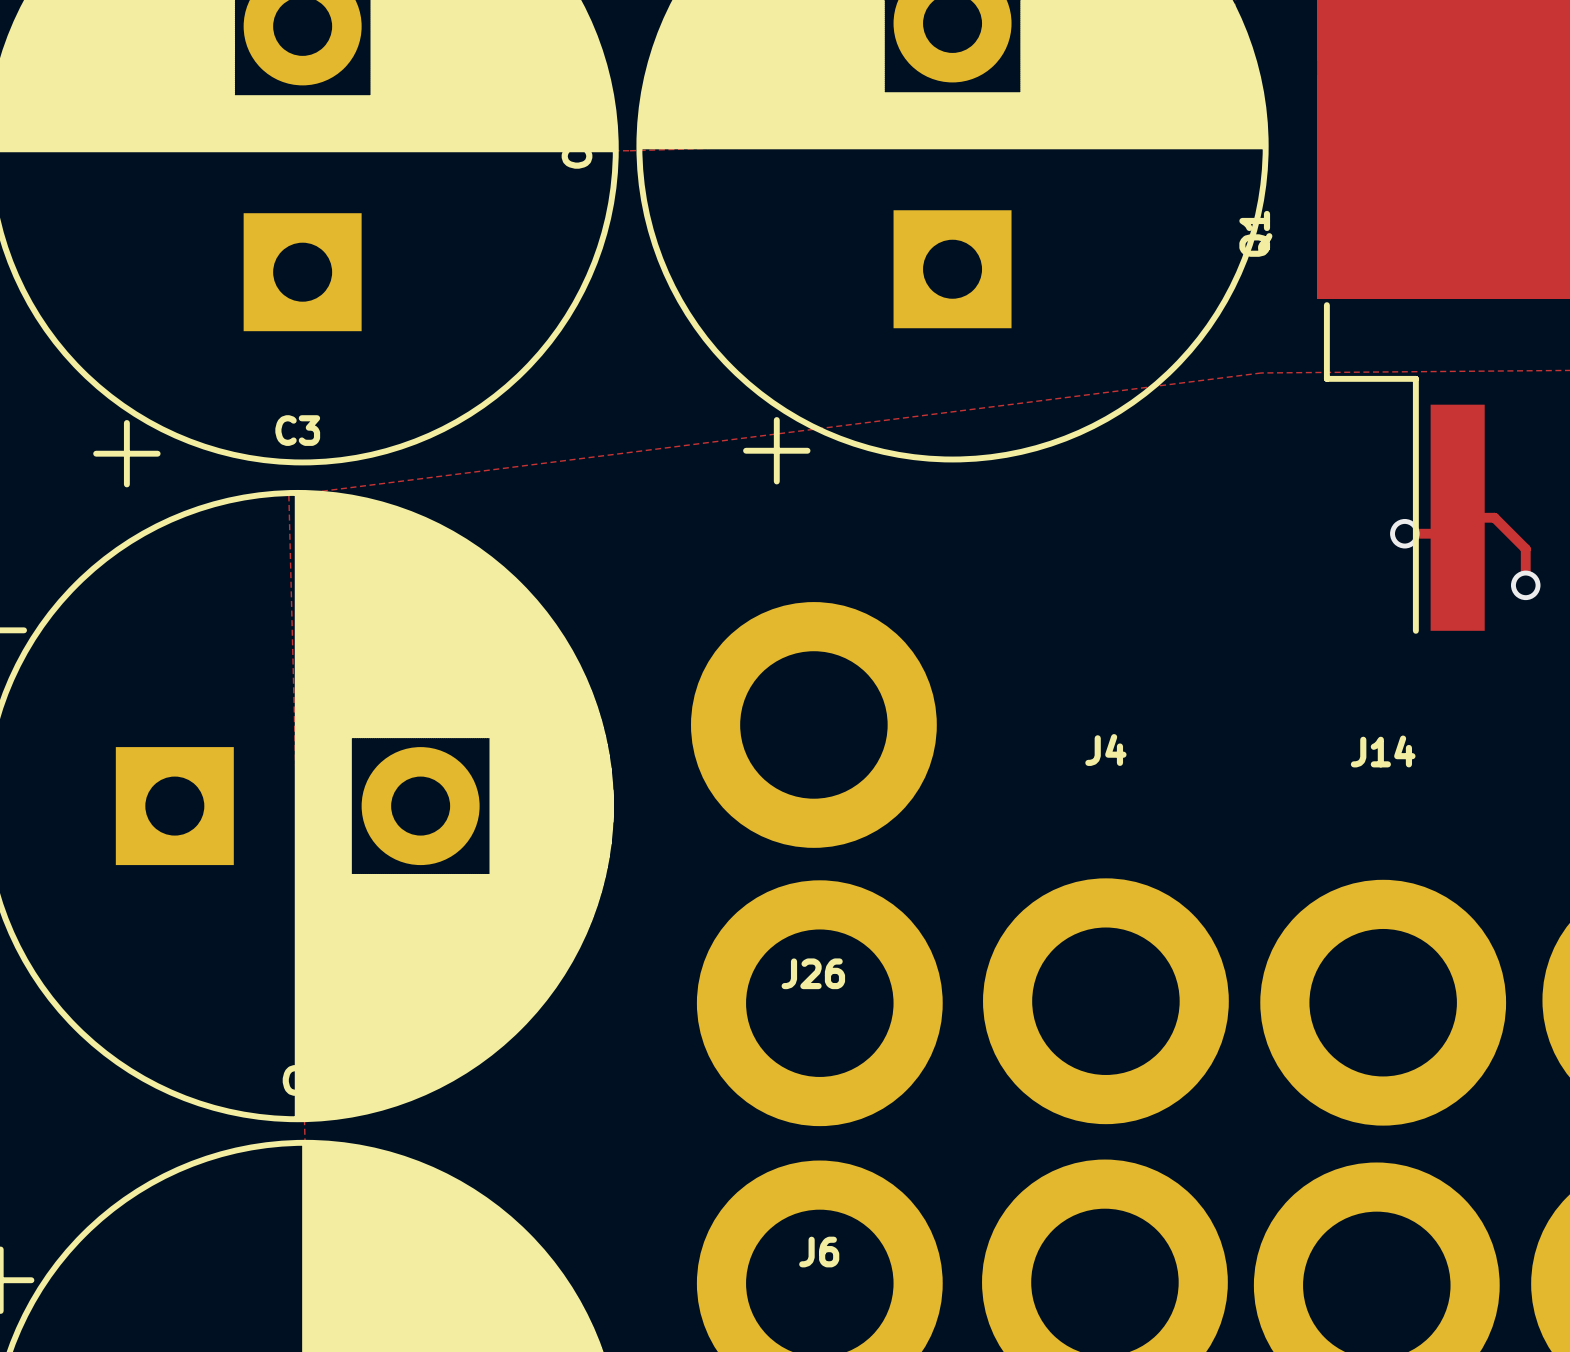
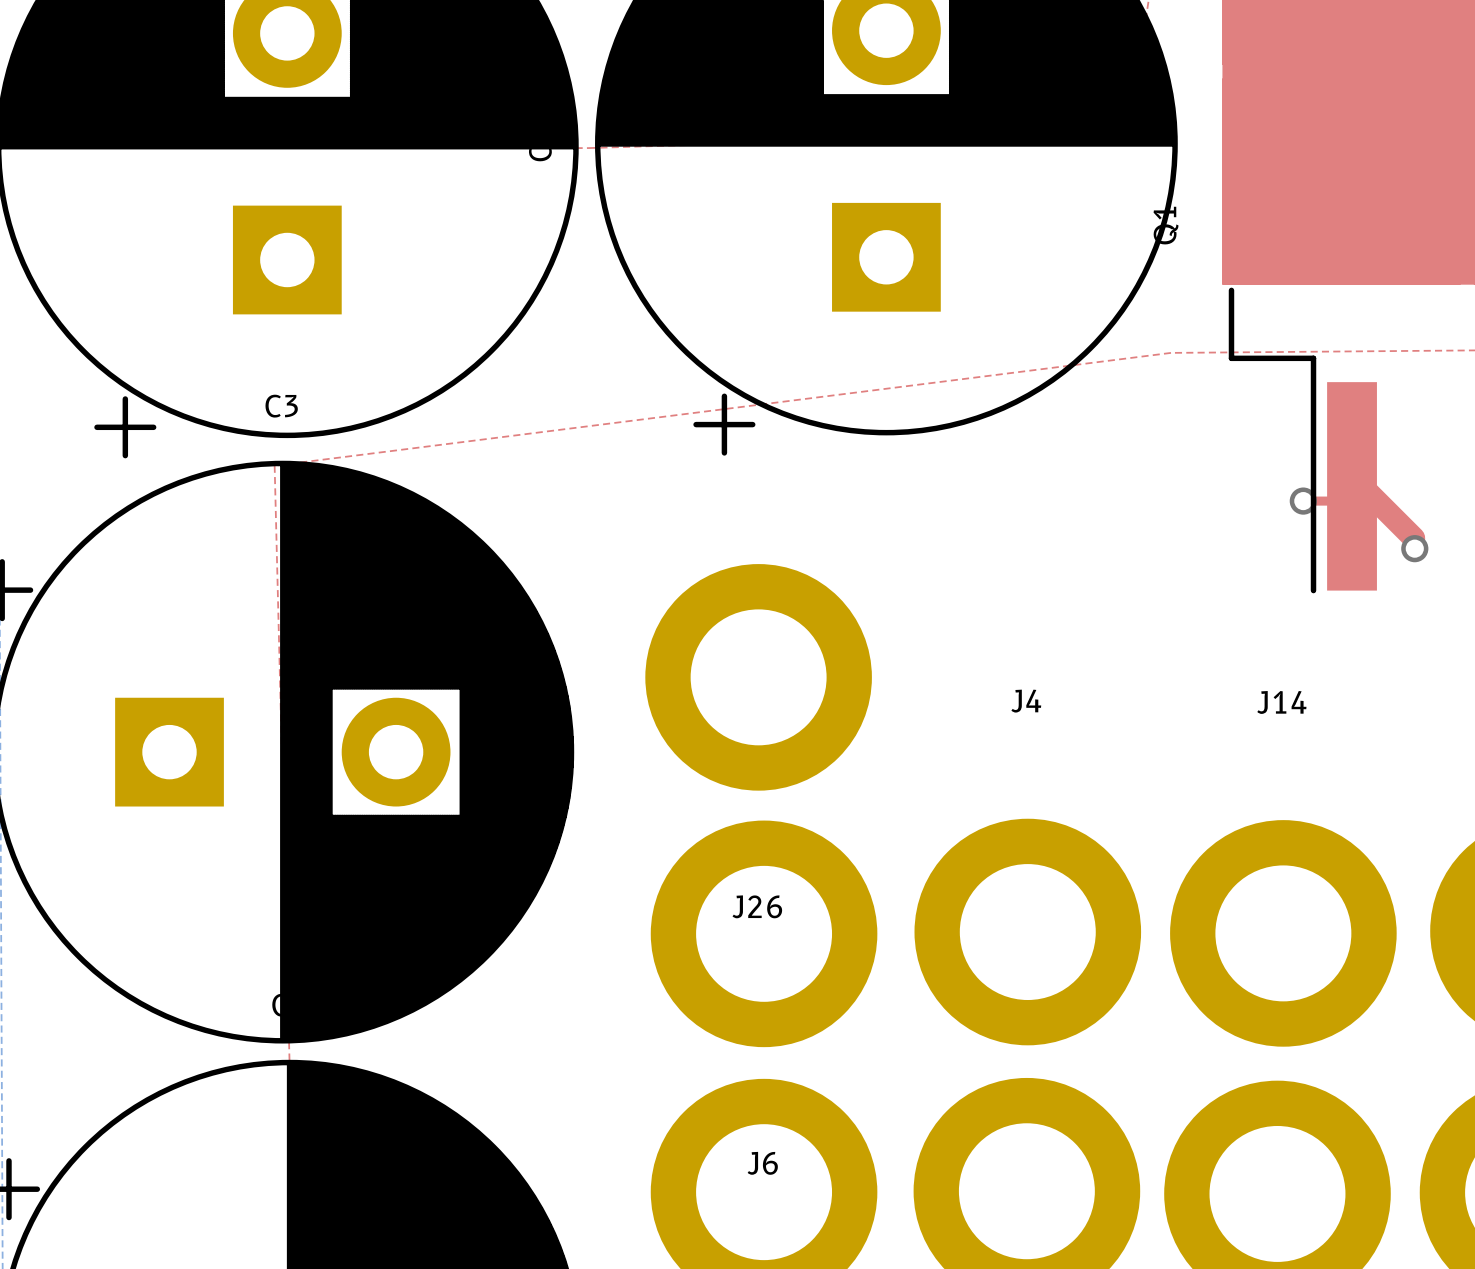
top track: (1468, 517) (1494, 517) (1525, 548) (1525, 585) -> (1362, 486) (1413, 538)

